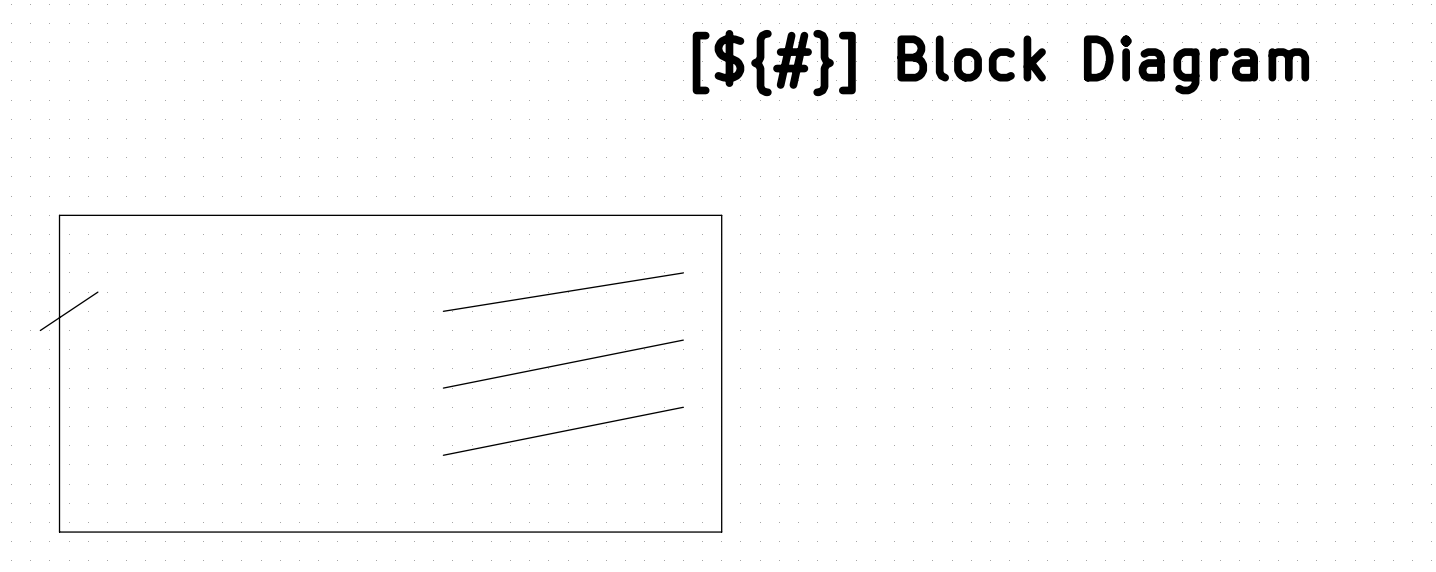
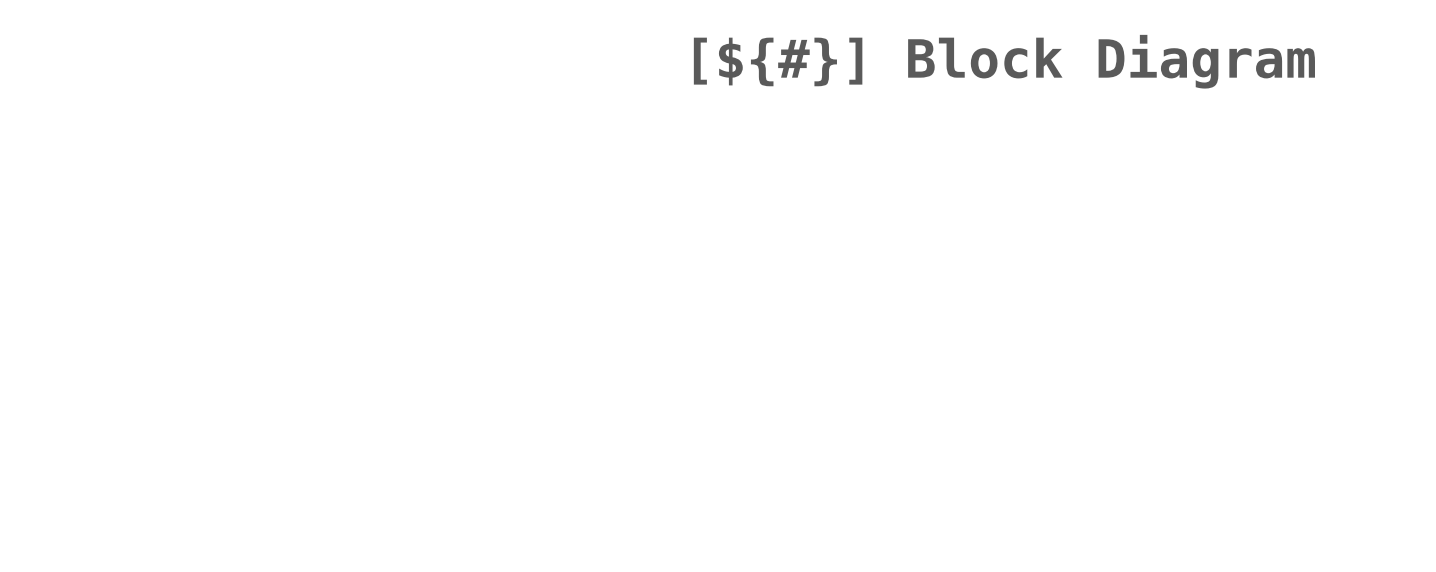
line: (59, 215) (721, 215) (721, 532) (59, 532) (59, 215) -> none
line: (683, 272) (443, 311) -> none
line: (97, 292) (40, 330) -> none
line: (683, 340) (443, 388) -> none
line: (683, 407) (443, 455) -> none

